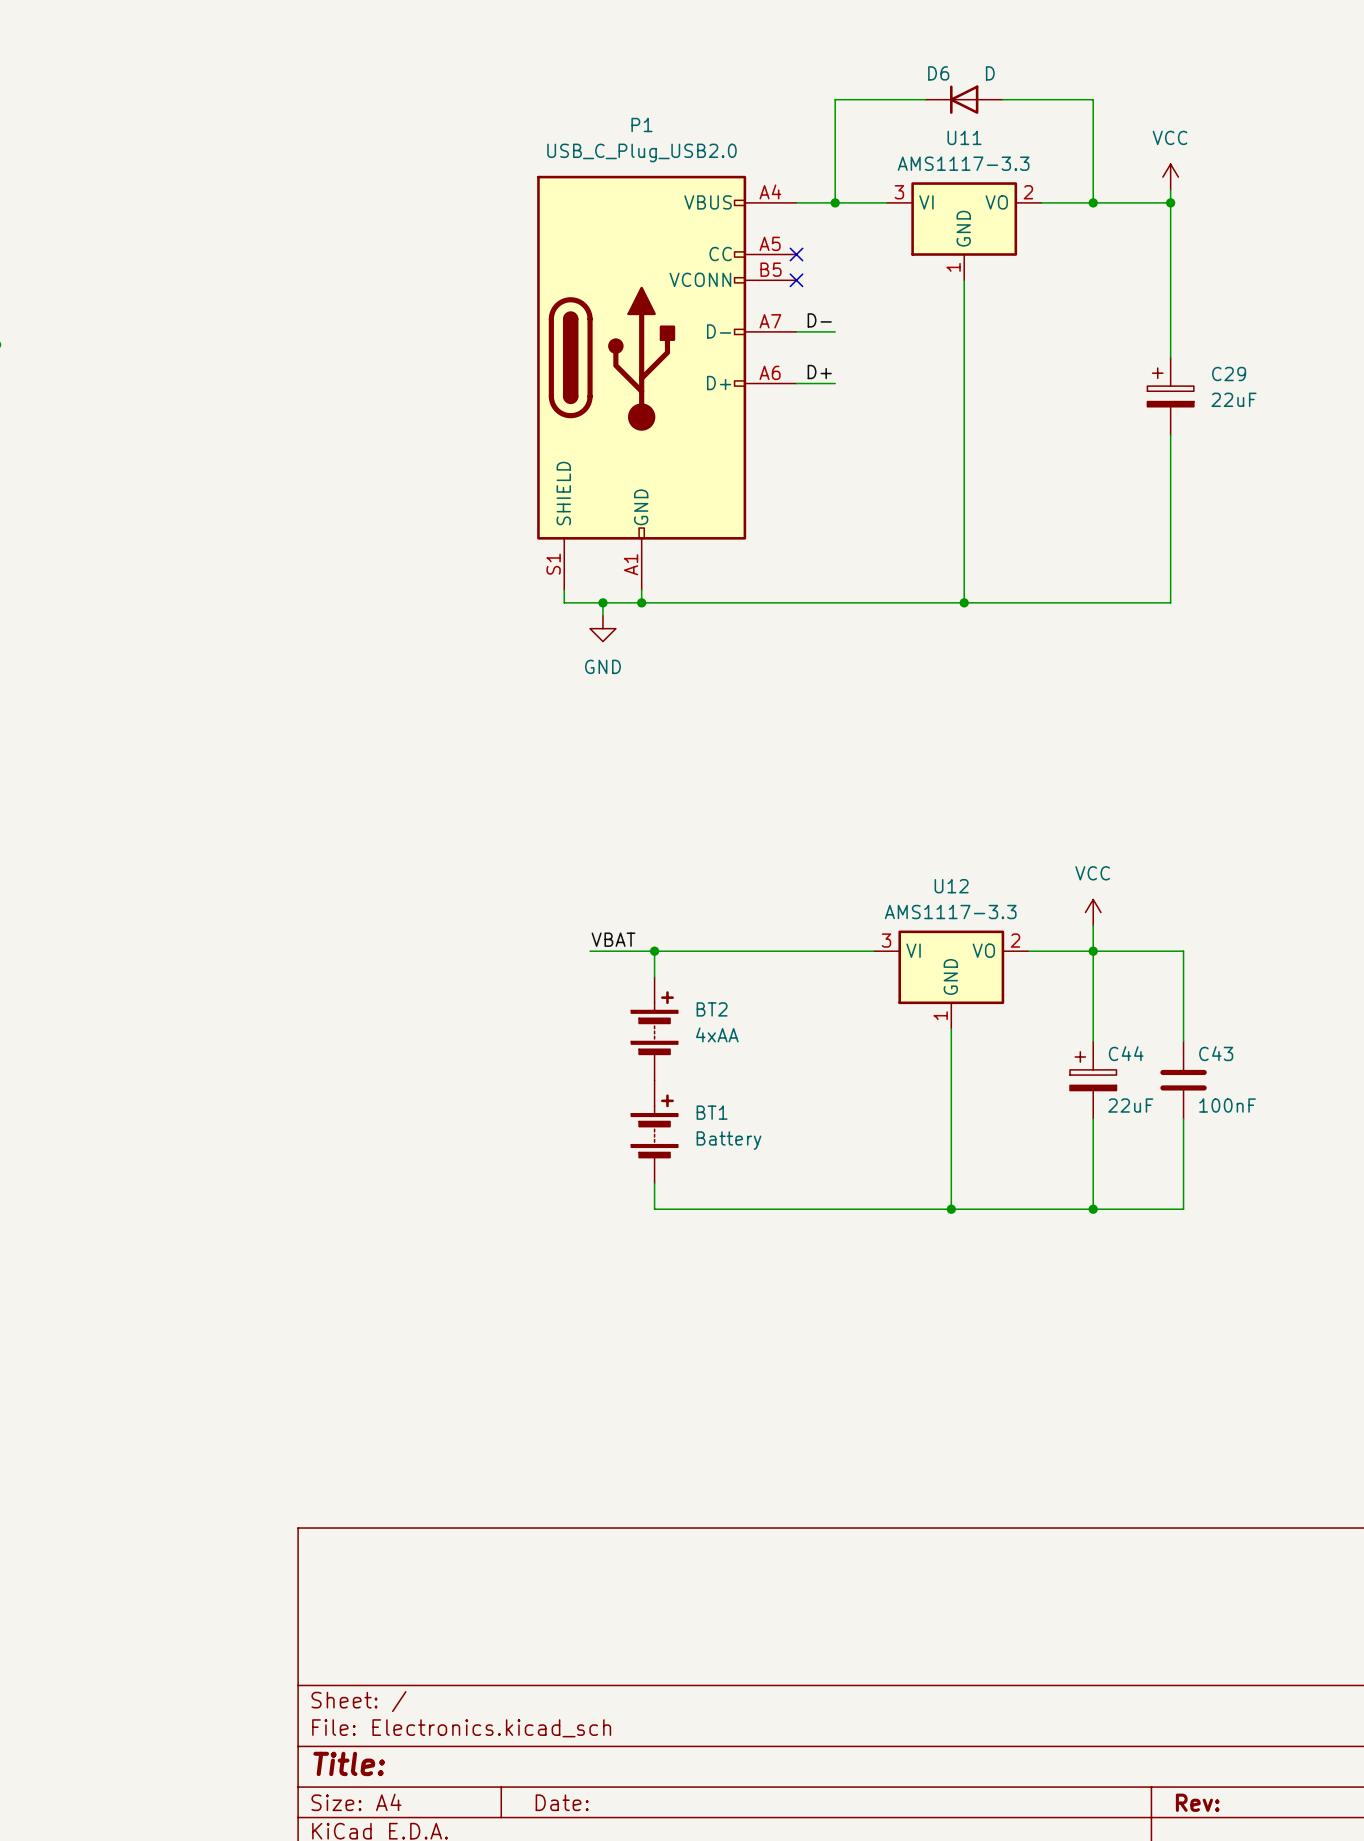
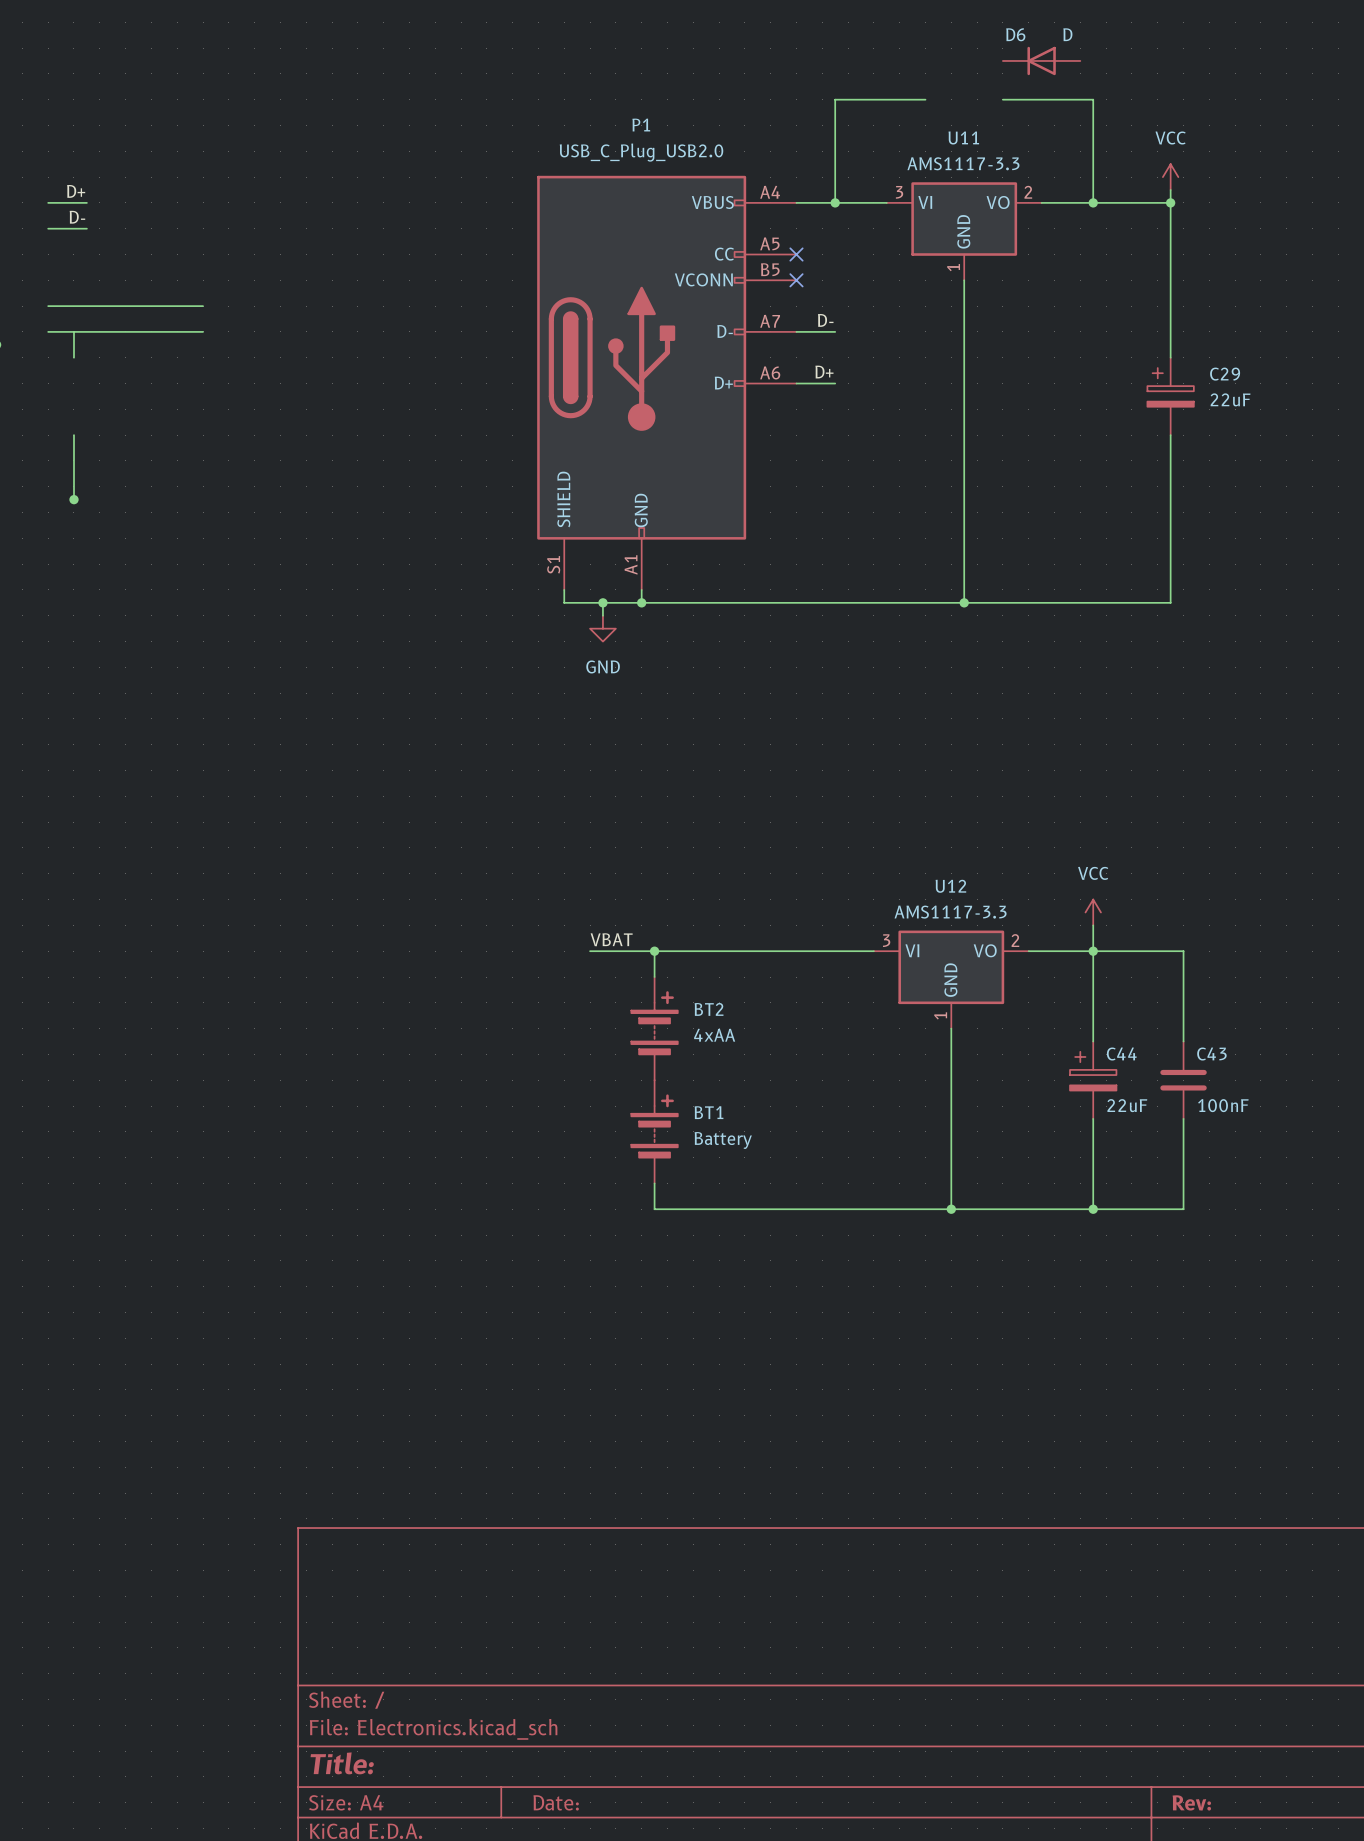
D6 position: (964, 99) -> (1041, 60)
label: none -> D+ (76, 191)
wire: none -> (48, 202) (86, 202)
label: none -> D- (77, 217)
wire: none -> (48, 228) (86, 228)
wire: none -> (48, 306) (203, 306)
wire: none -> (48, 331) (203, 331)
wire: none -> (73, 331) (73, 357)
wire: none -> (73, 435) (73, 499)
junction: none -> (73, 499)

